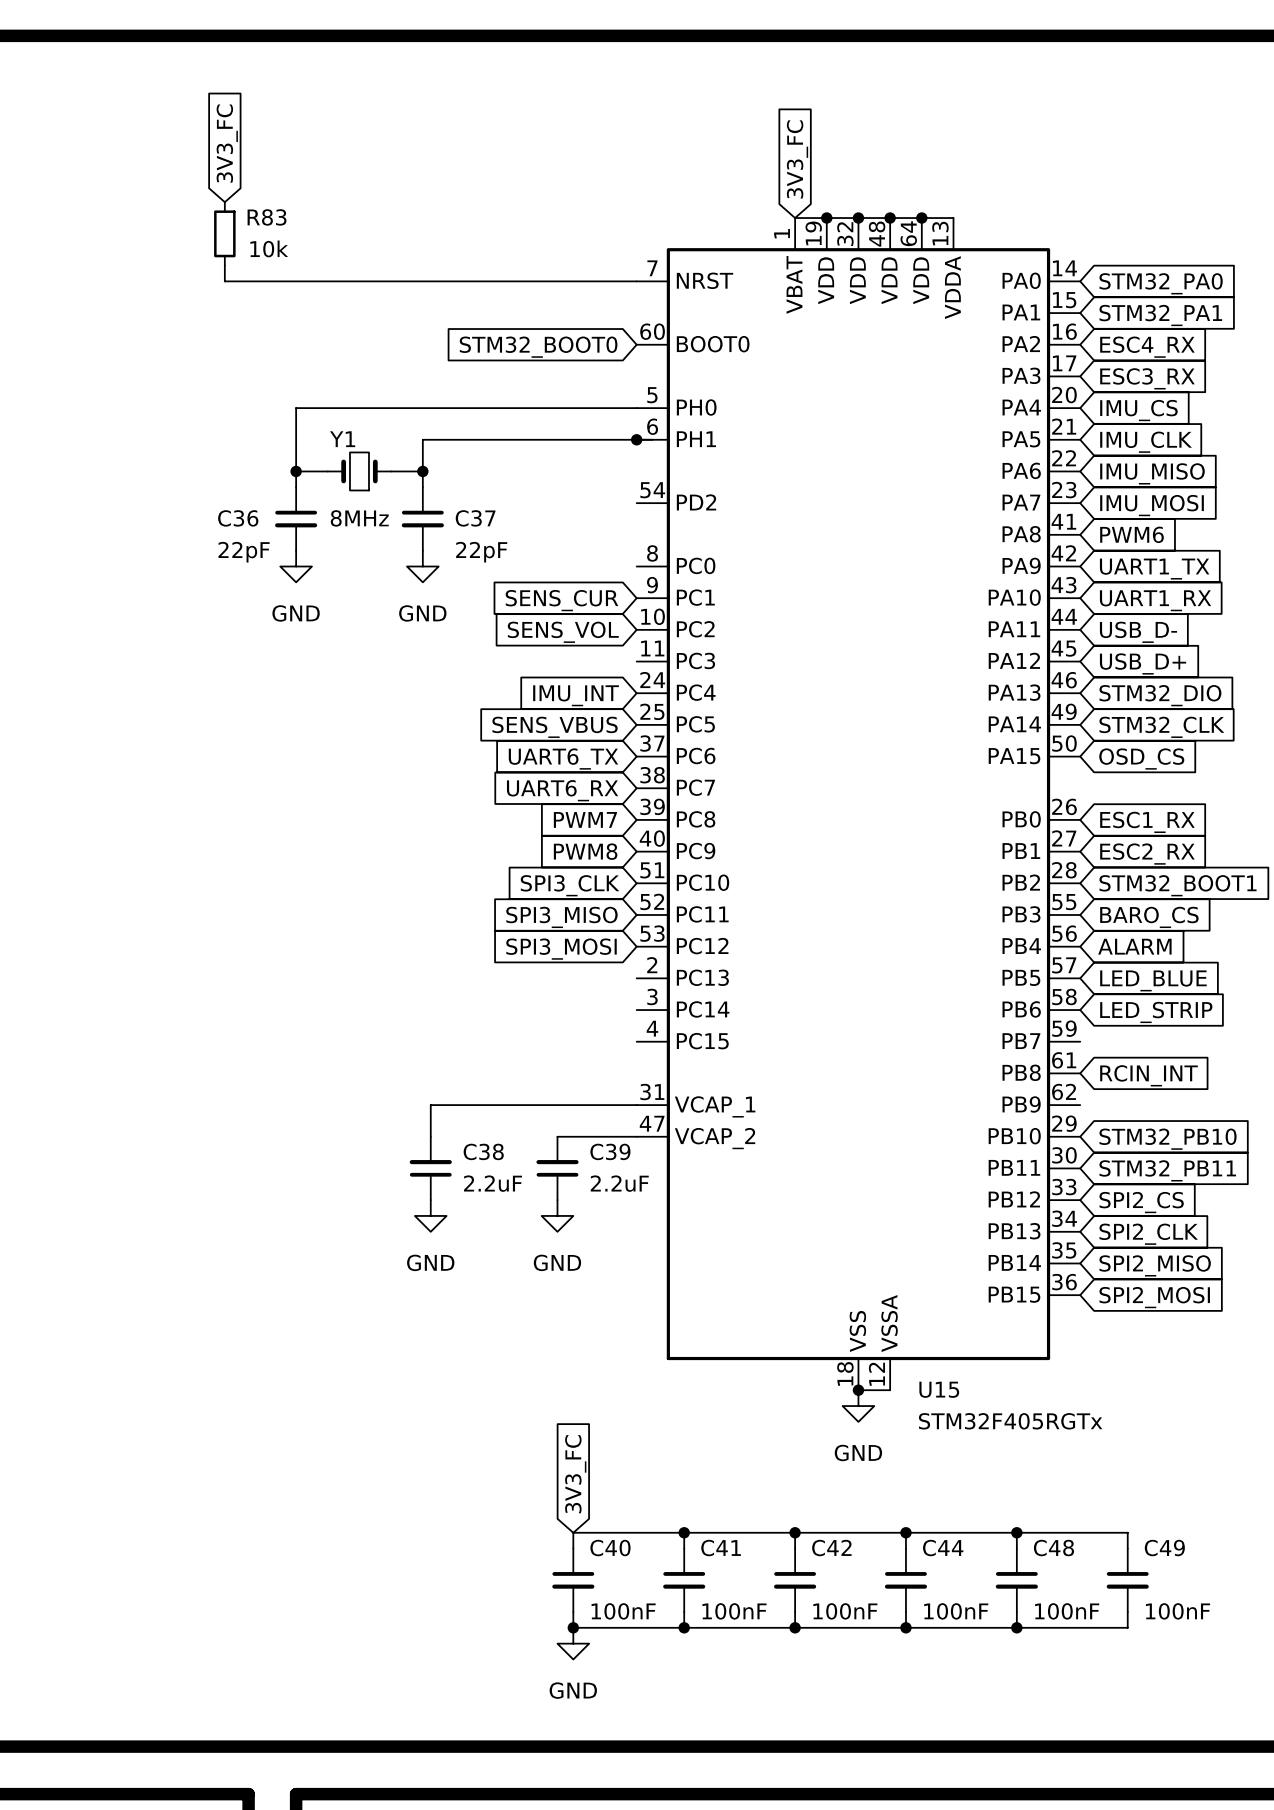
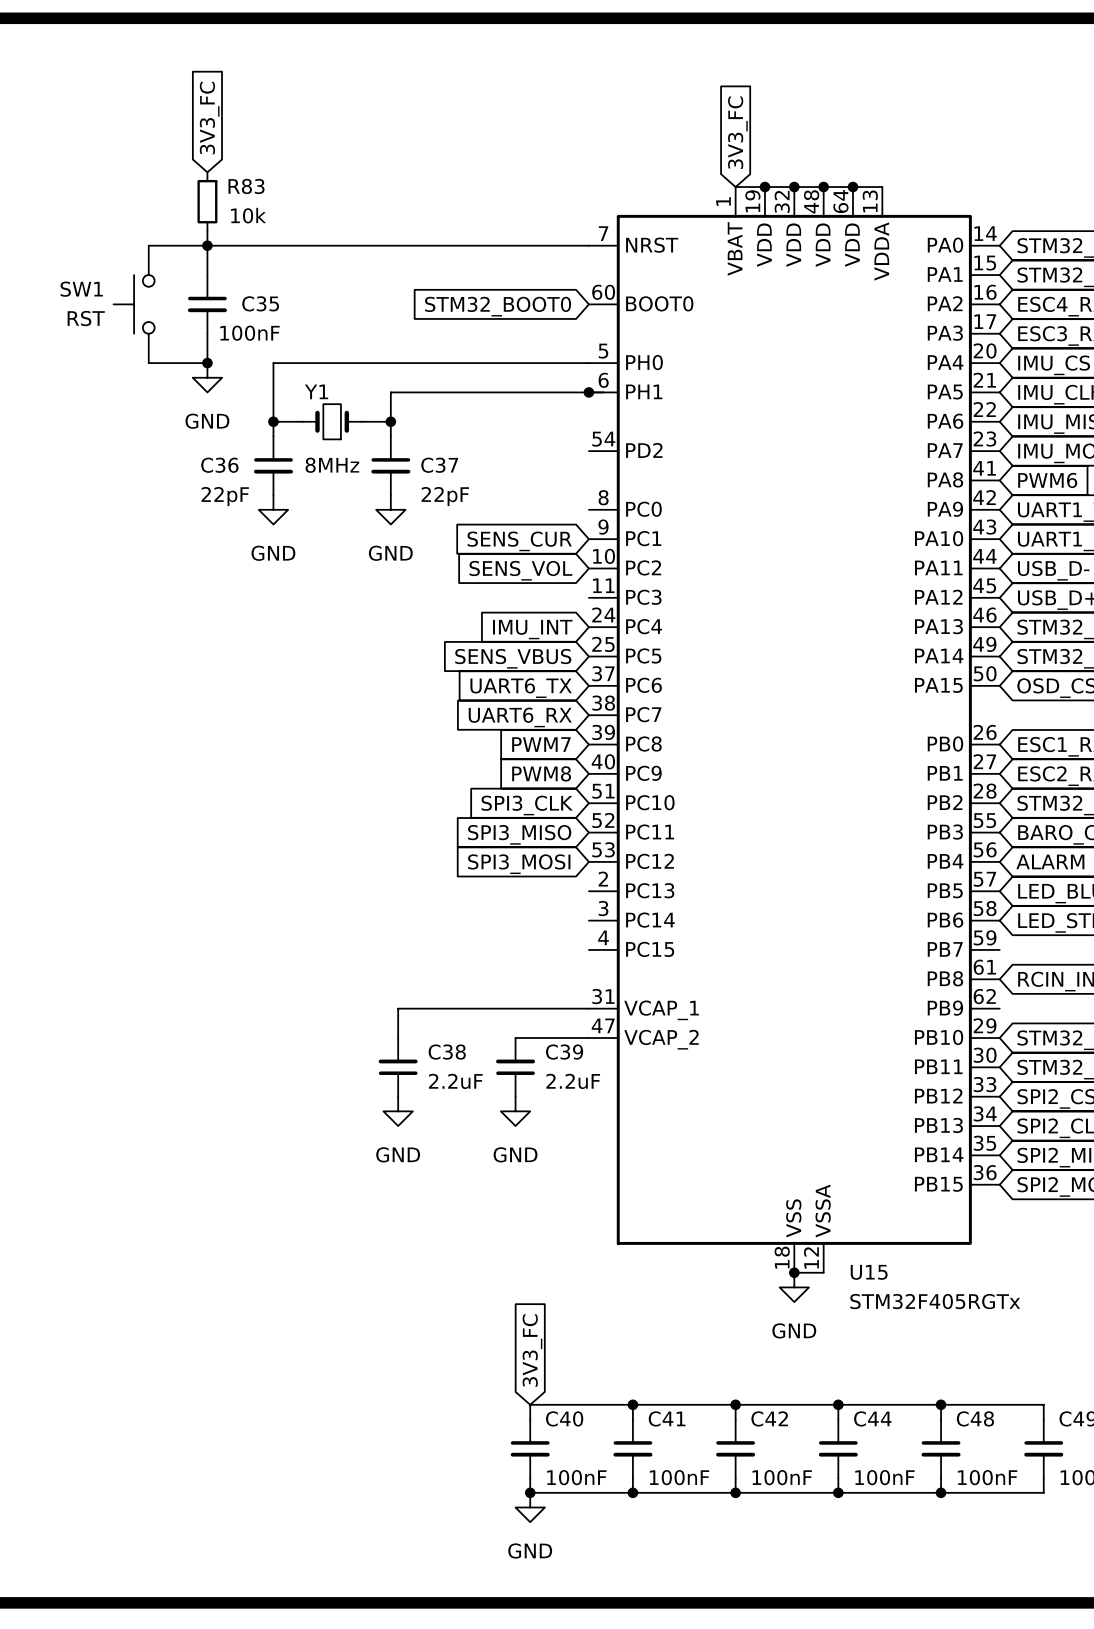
wire: none -> (148, 245) (207, 245) (207, 275)
junction: none -> (207, 245)
SW1: none -> RST (134, 304)
C35: none -> 100nF (207, 304)
wire: none -> (207, 333) (207, 363) (148, 363)
junction: none -> (207, 363)
power symbol: none -> GND (207, 377)

